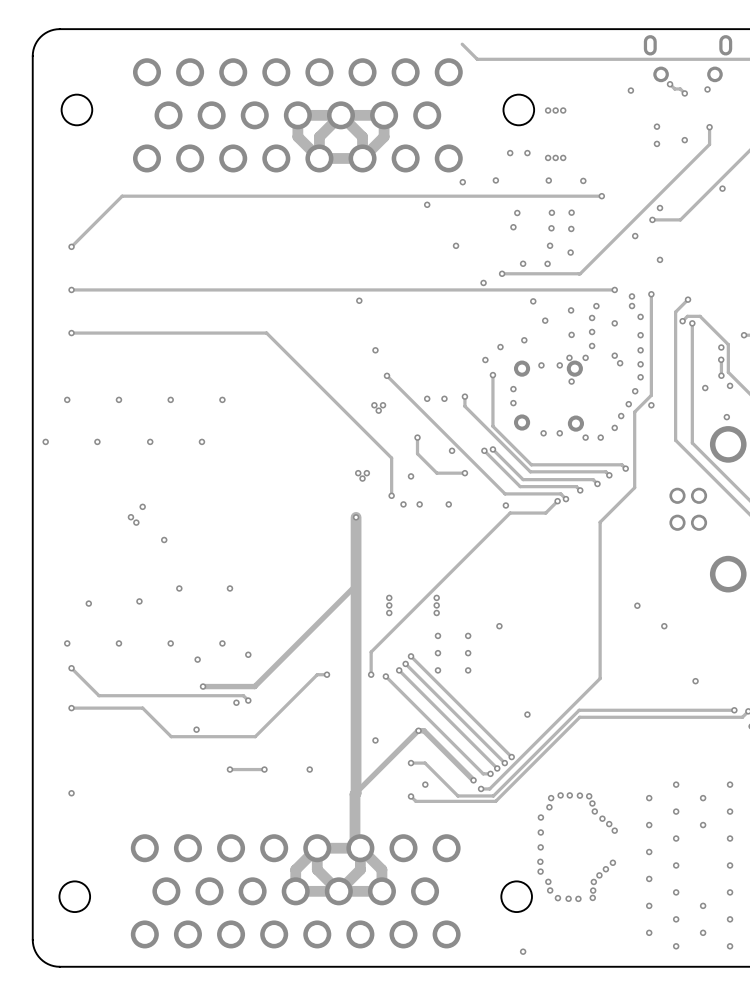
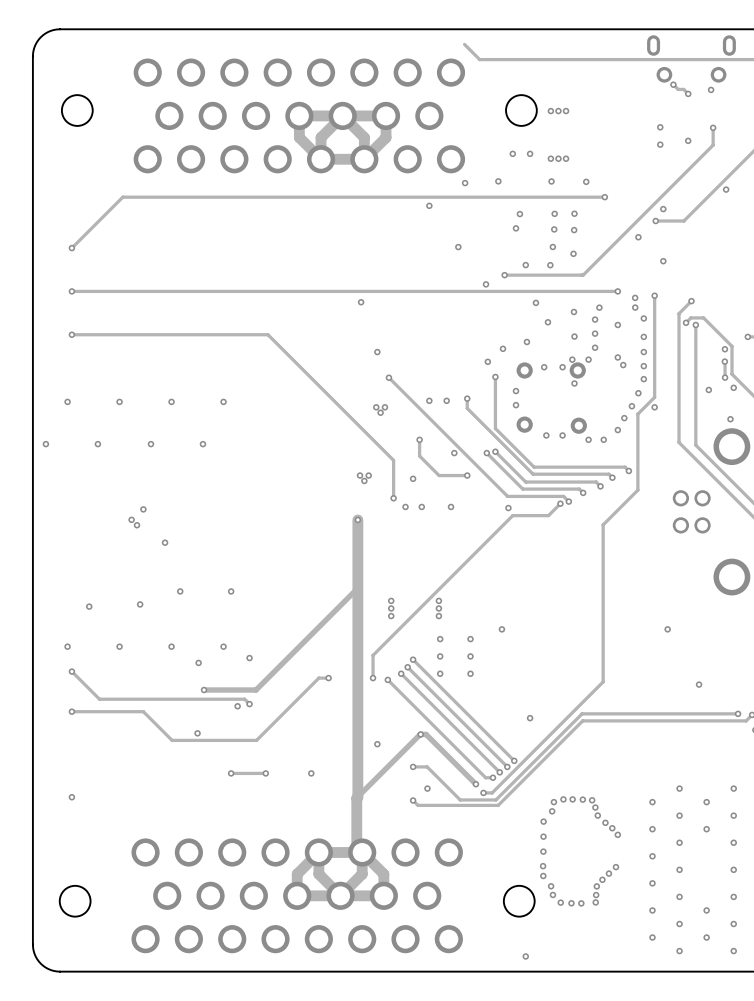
via: (630, 90) -> none
via: (637, 605) -> none

